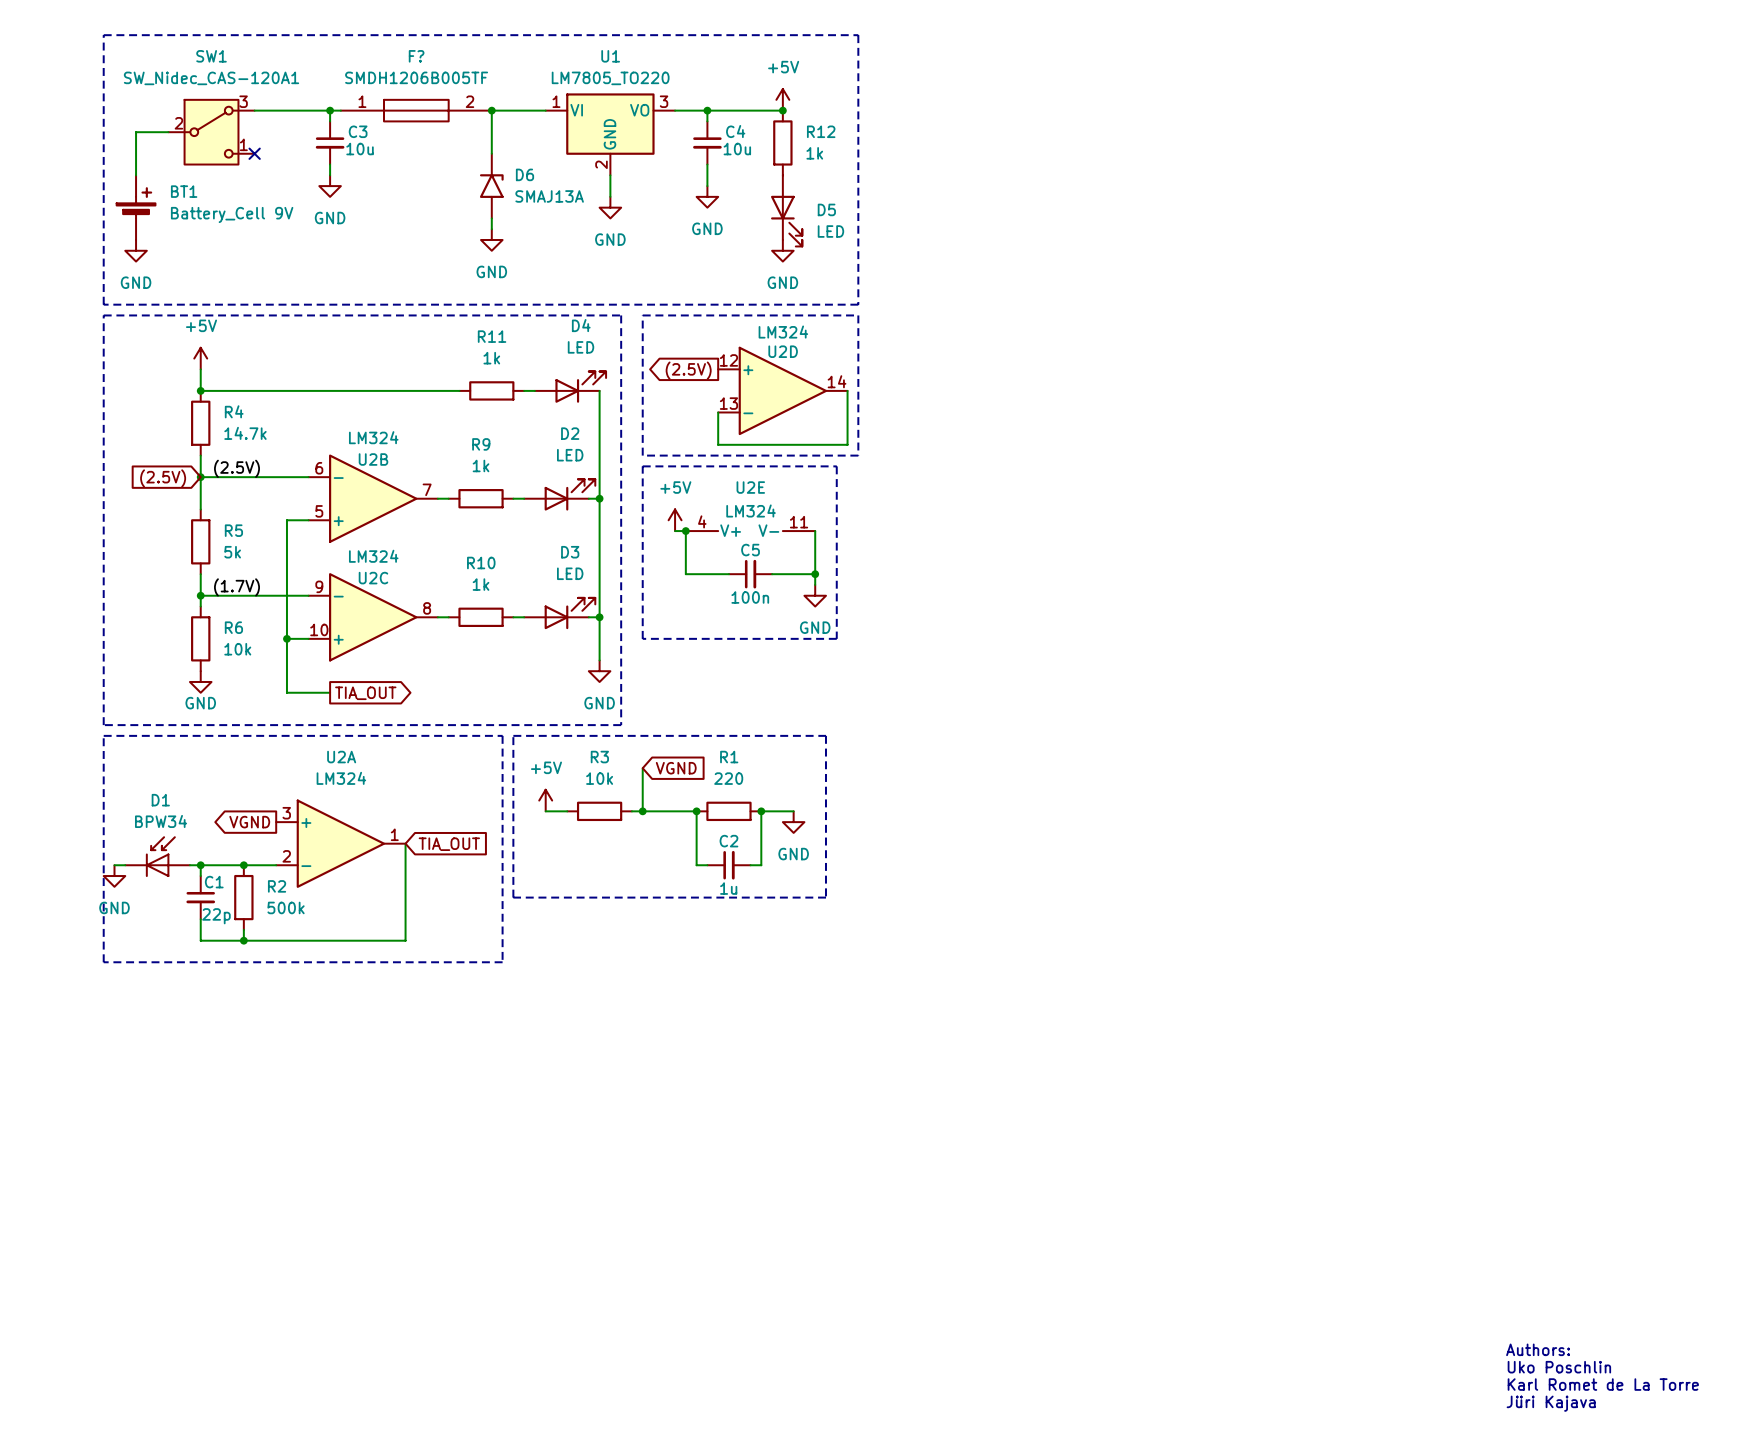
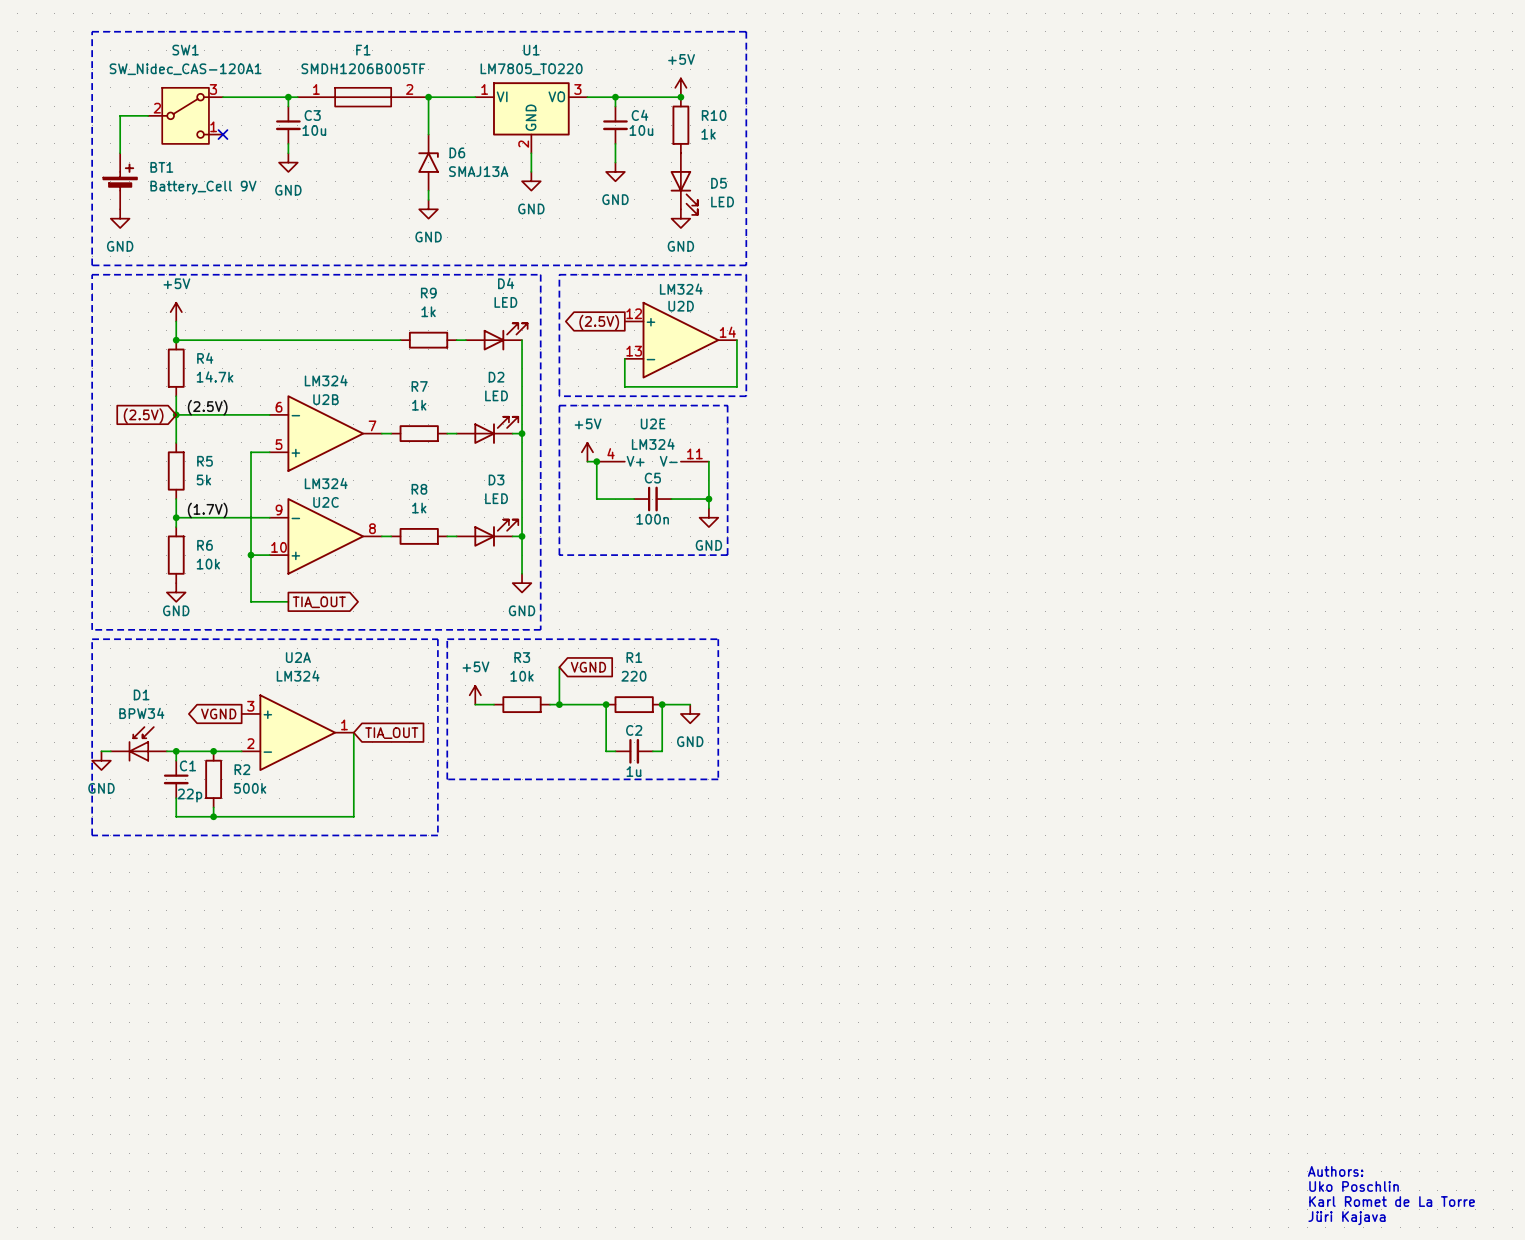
F? name: F? (416, 56) -> F1 (363, 50)
R12 name: R12 (821, 131) -> R10 (714, 115)
R11 name: R11 (492, 336) -> R9 (428, 293)
R9 name: R9 (481, 444) -> R7 (419, 386)
R10 name: R10 (481, 562) -> R8 (419, 489)

